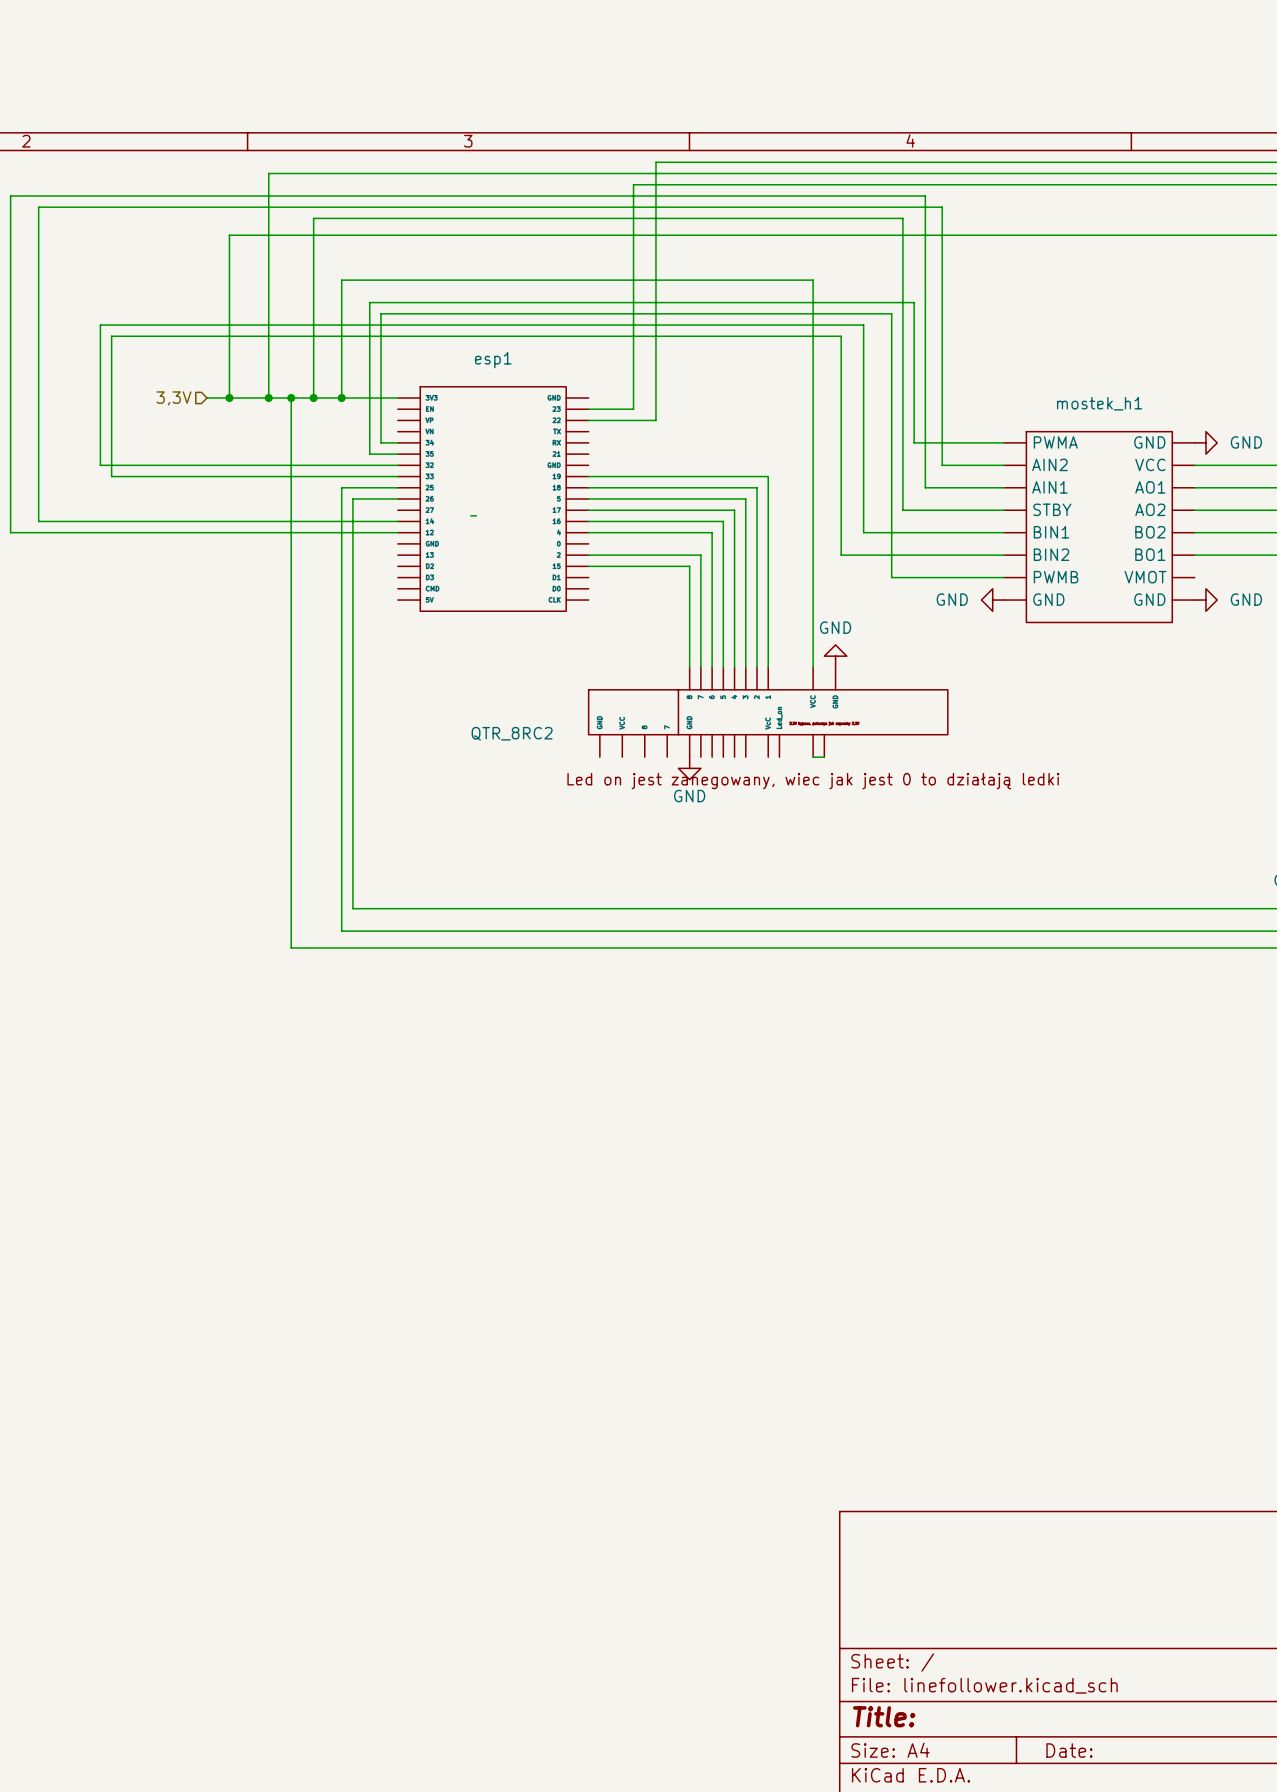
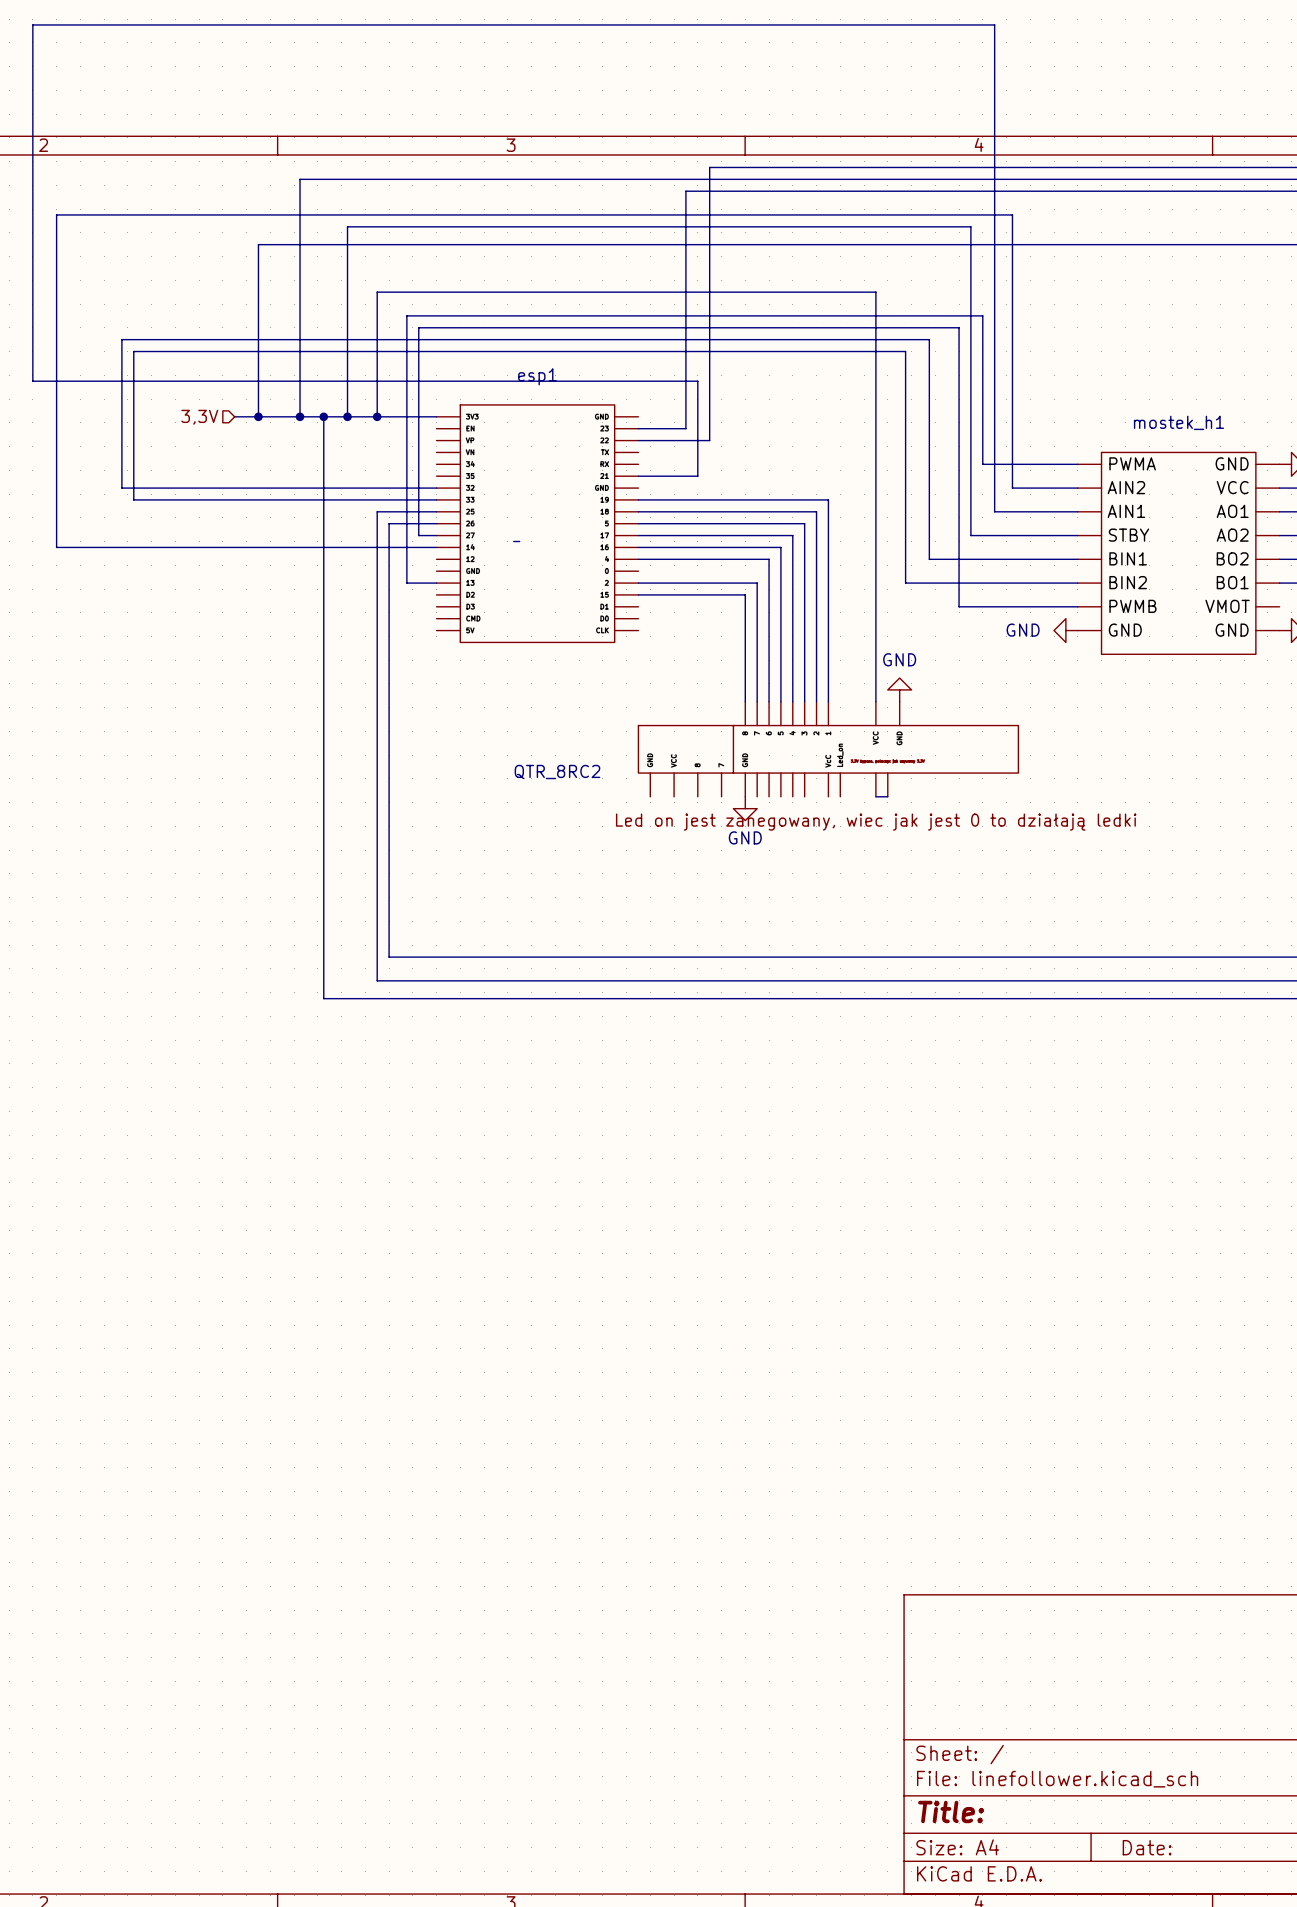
wire: (925, 195) (10, 195) (10, 532) (397, 532) -> (994, 203) (994, 24) (32, 24) (32, 381) (697, 381) (697, 476) (638, 476)
wire: (380, 442) (397, 442) -> (418, 464) (418, 535) (436, 535)
wire: (369, 454) (397, 454) -> (406, 476) (406, 583) (436, 583)

